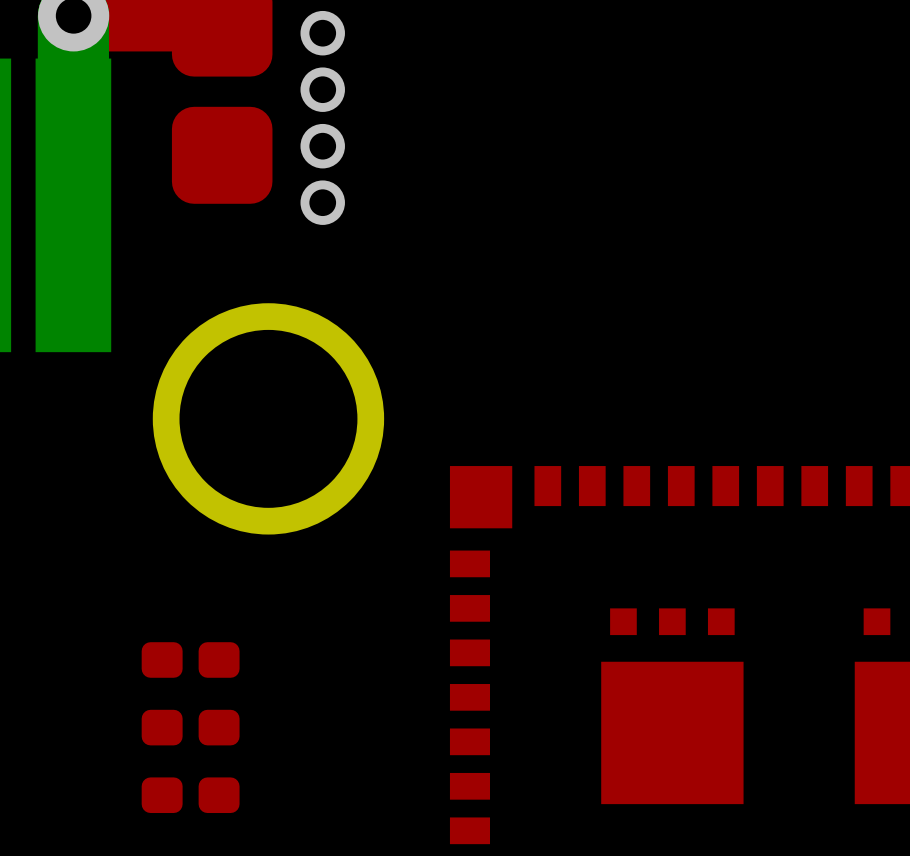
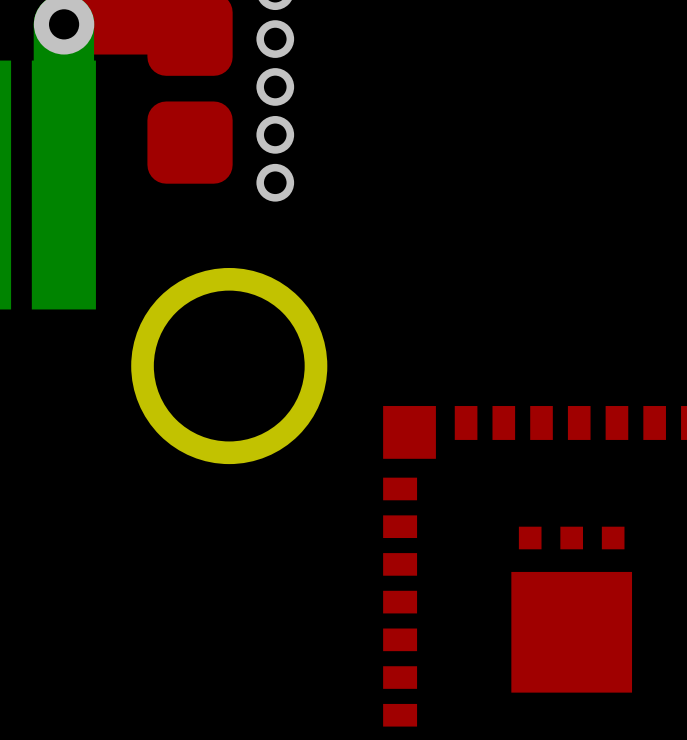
part: (190, 659) -> none
part: (190, 727) -> none
part: (190, 795) -> none

